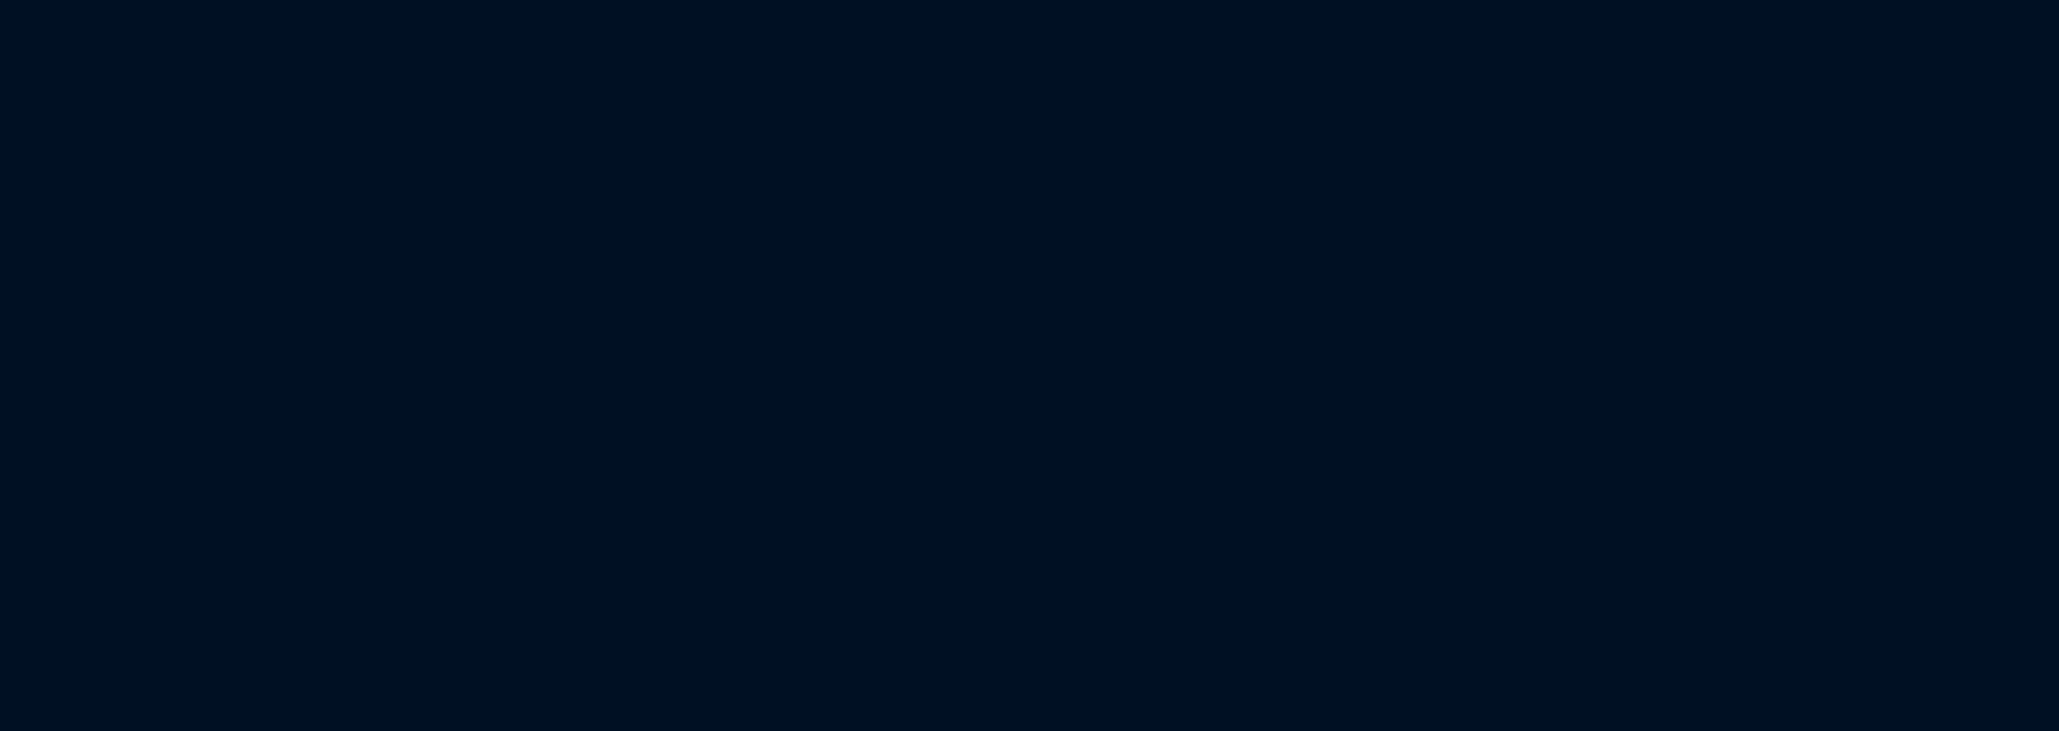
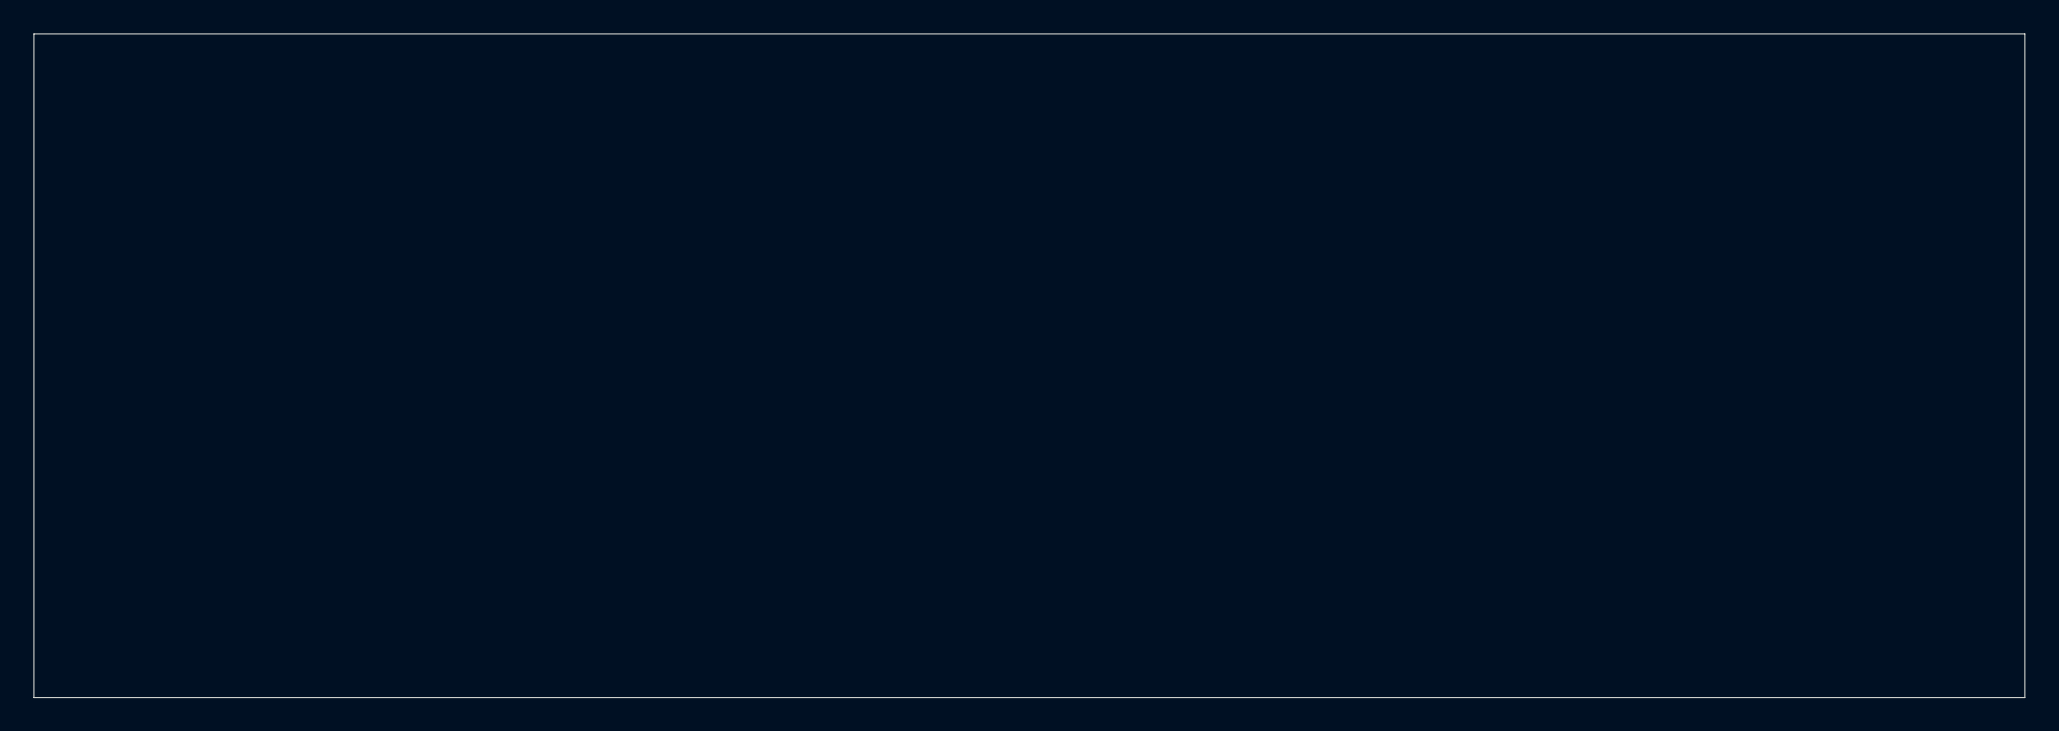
board edge: none -> (33, 33) (2024, 33) (2024, 697) (33, 697) (33, 33)

